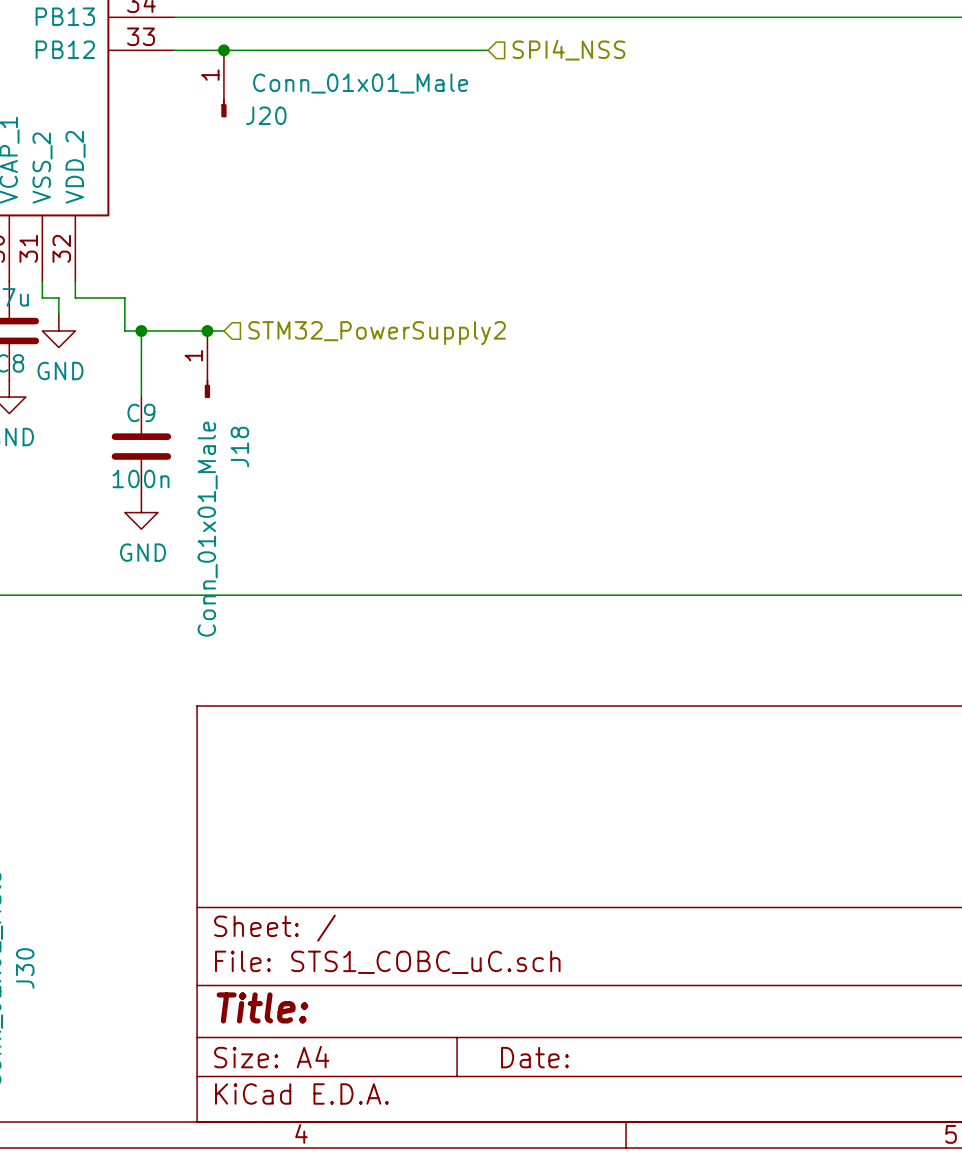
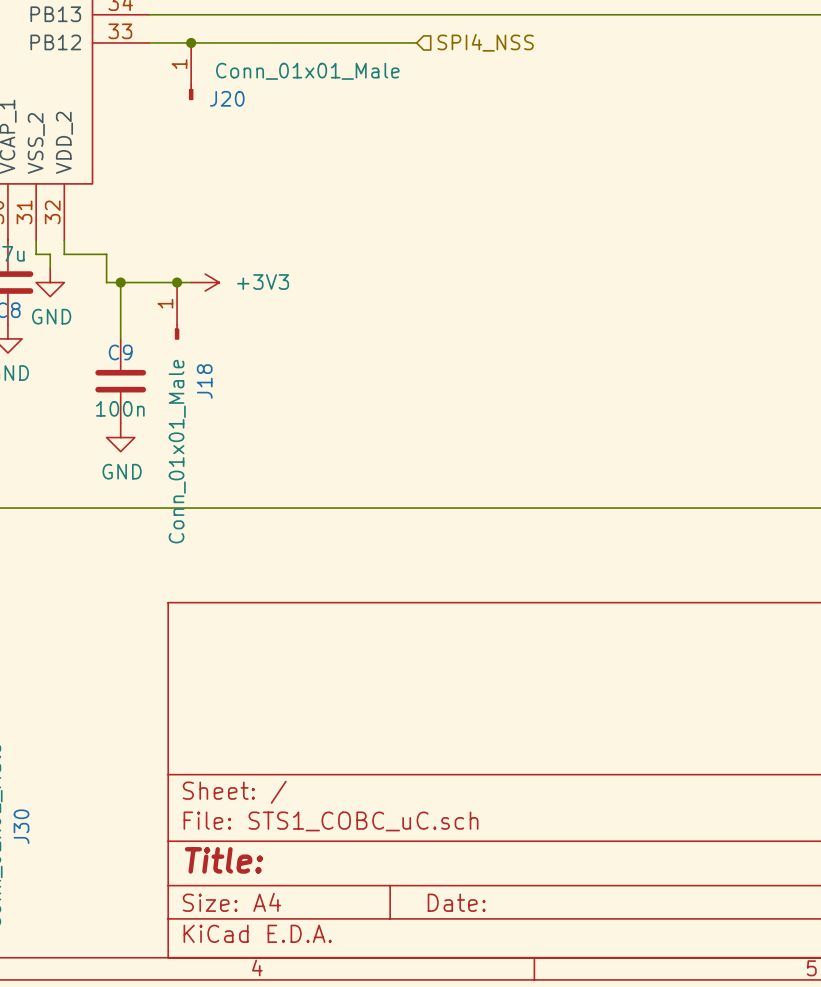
power symbol: none -> +3V3 (205, 282)
hierarchical label: STM32_PowerSupply2 (377, 333) -> none

